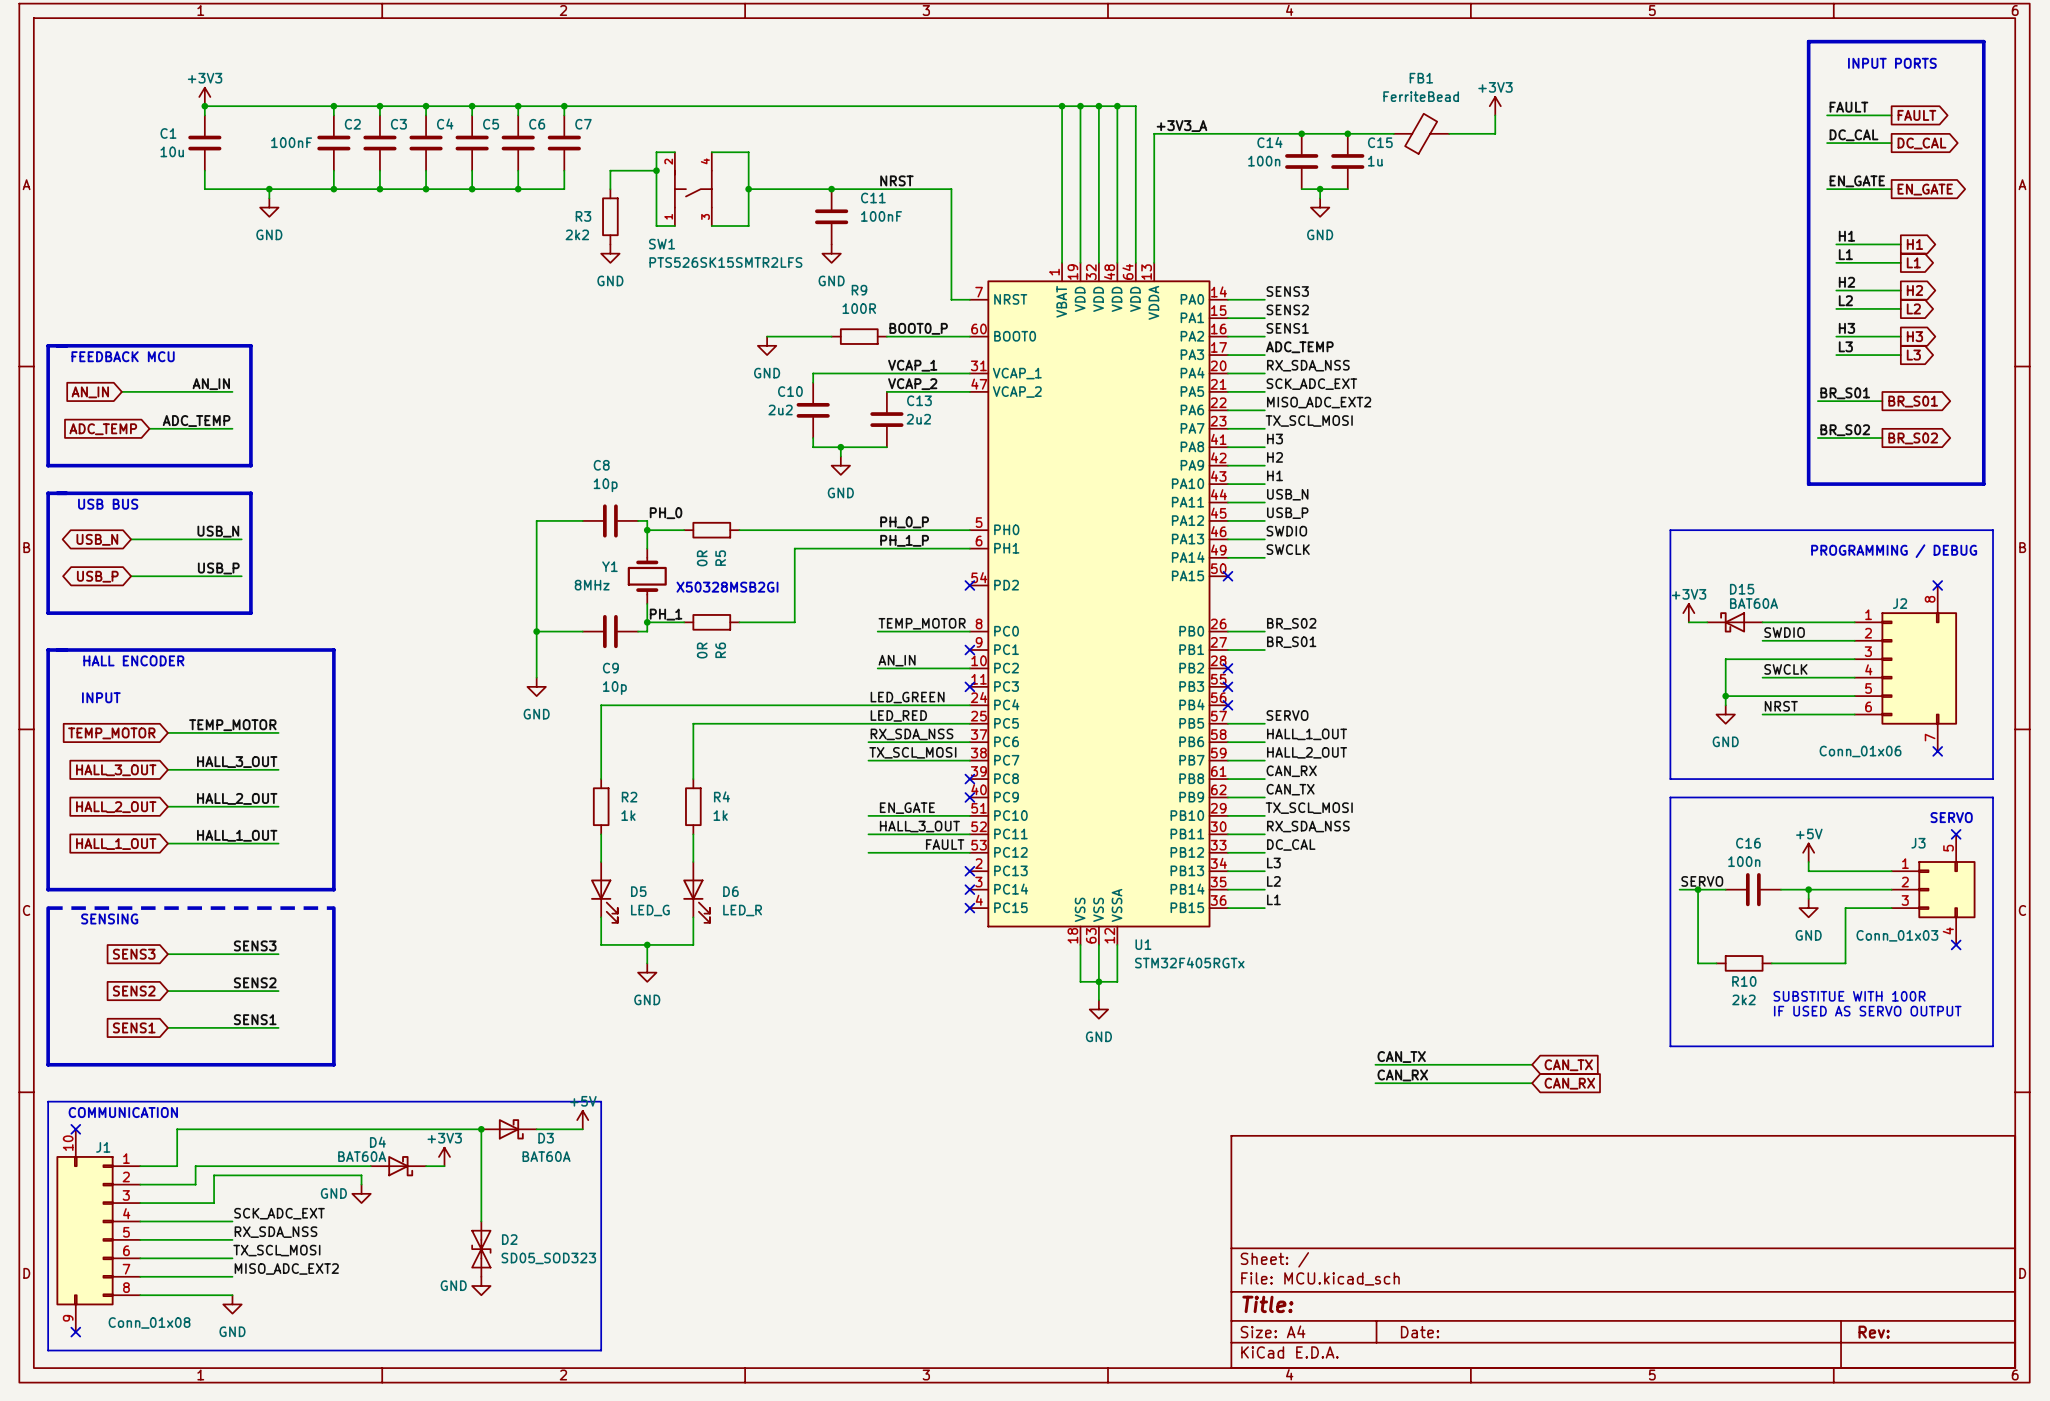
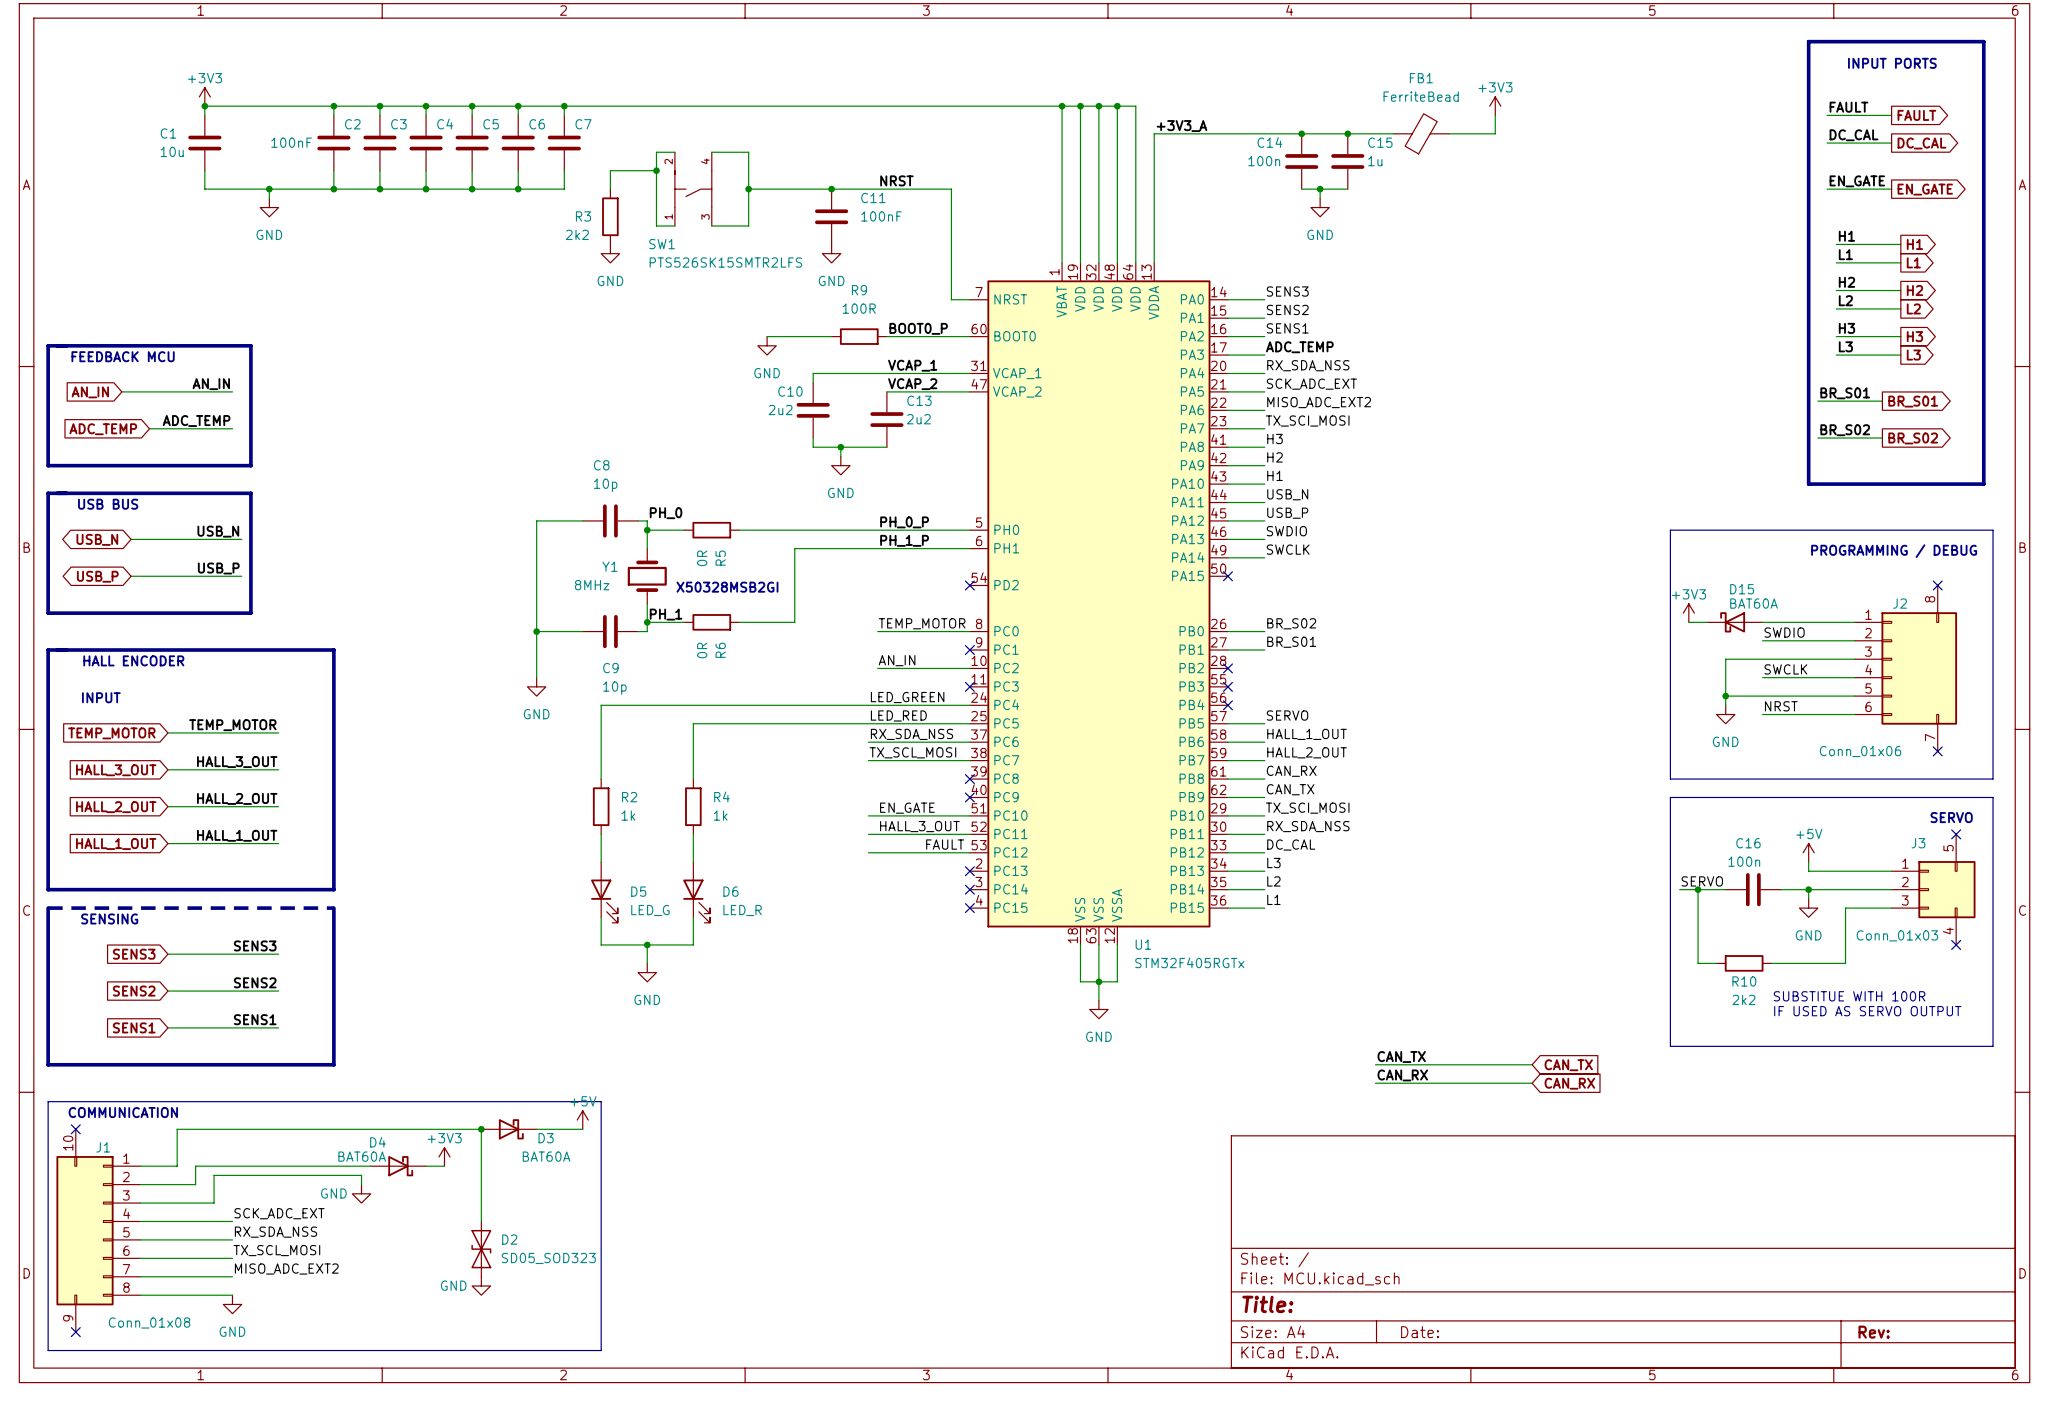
label: TX_SCL_MOSI (1309, 421) -> TX_SCI_MOSI (1307, 421)
label: TX_SCL_MOSI (1309, 808) -> TX_SCI_MOSI (1307, 808)

